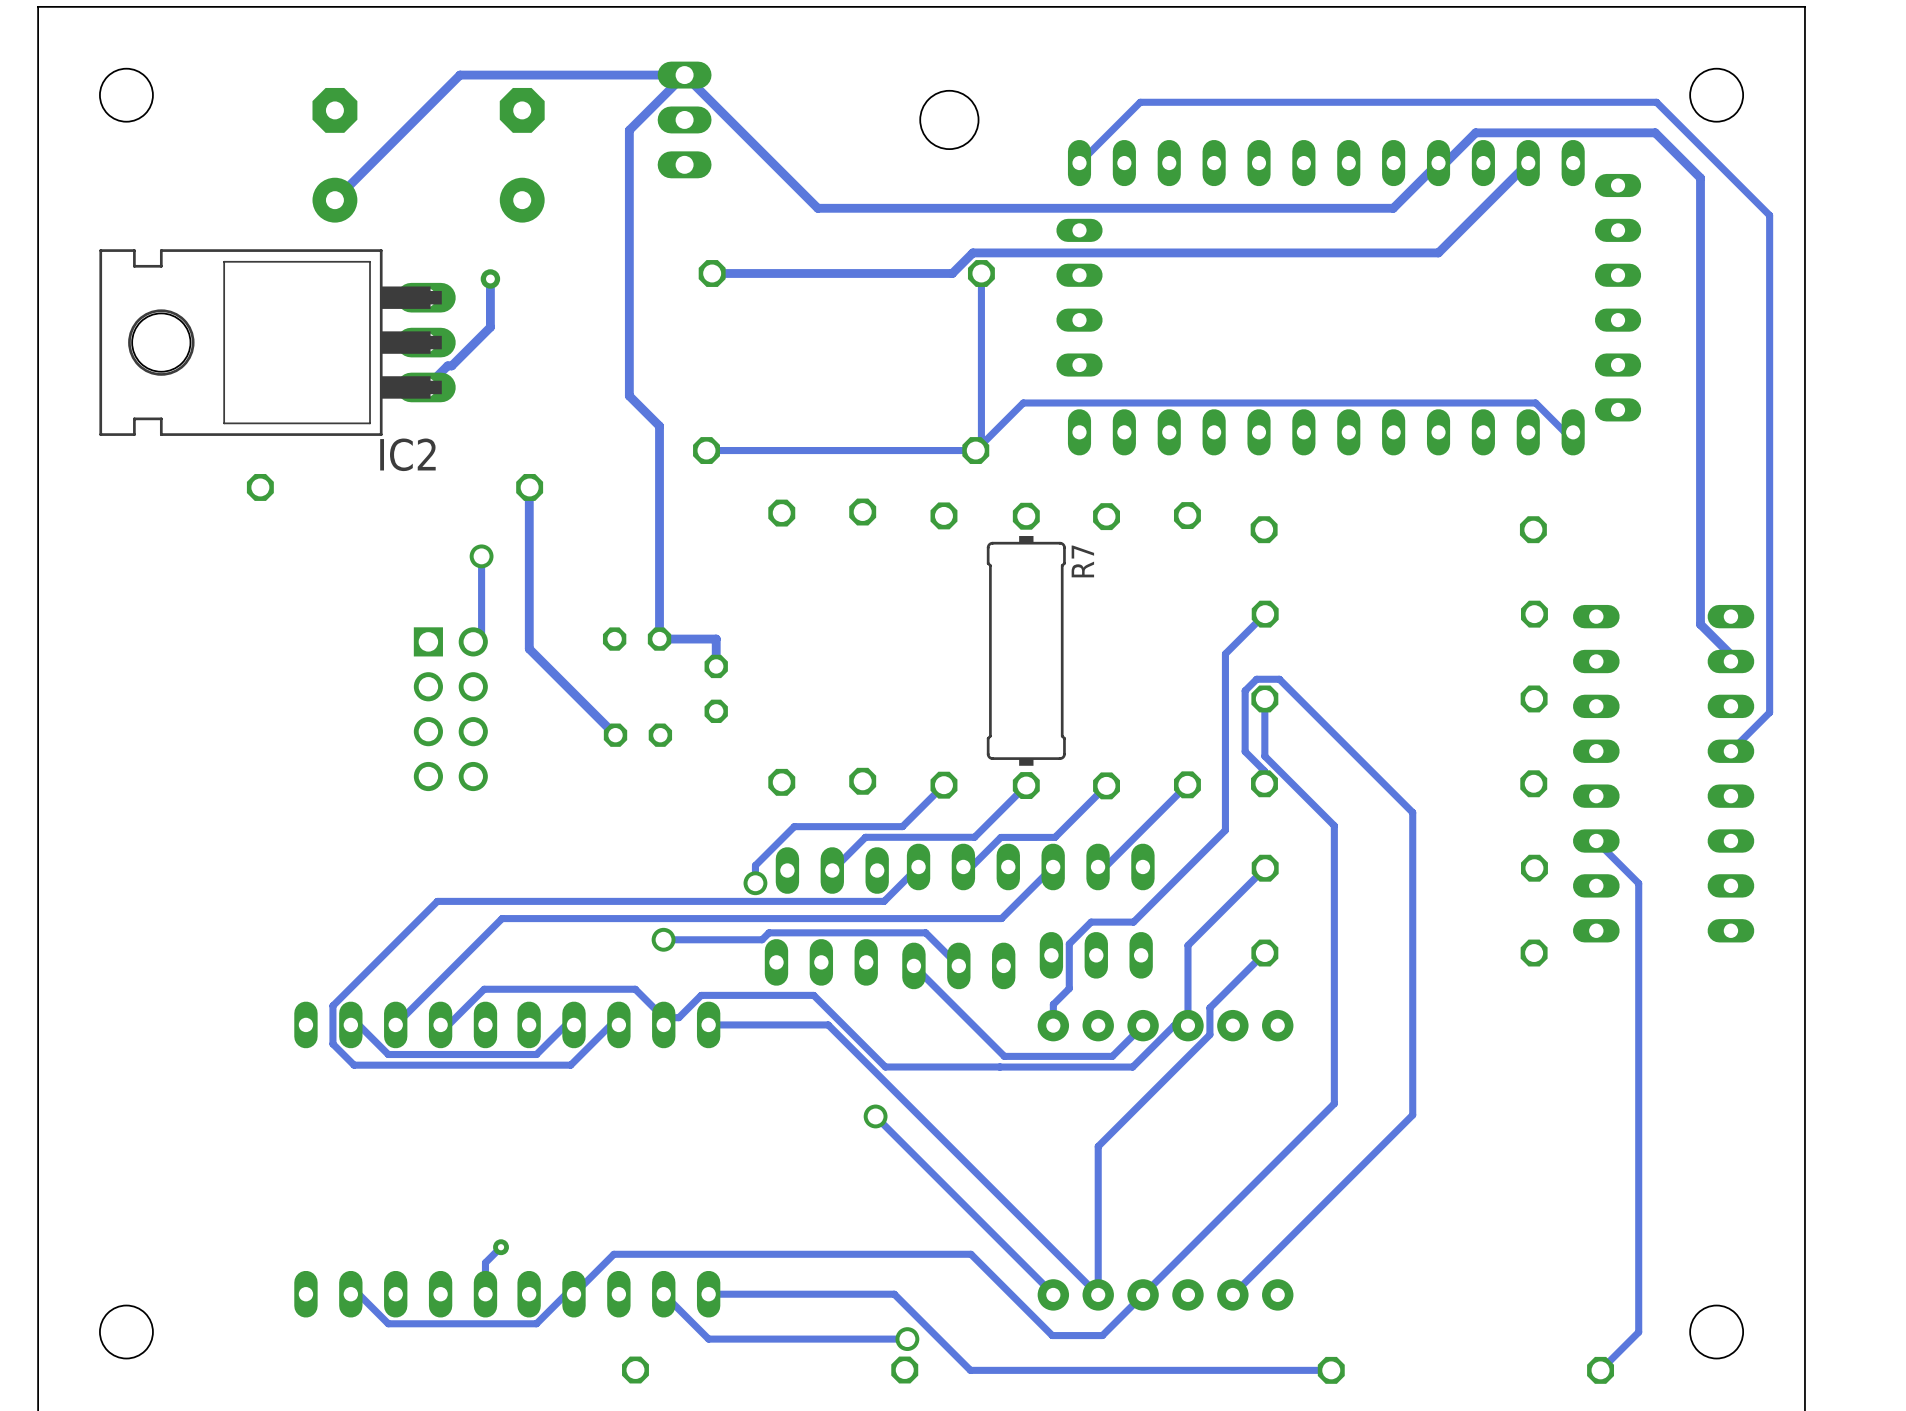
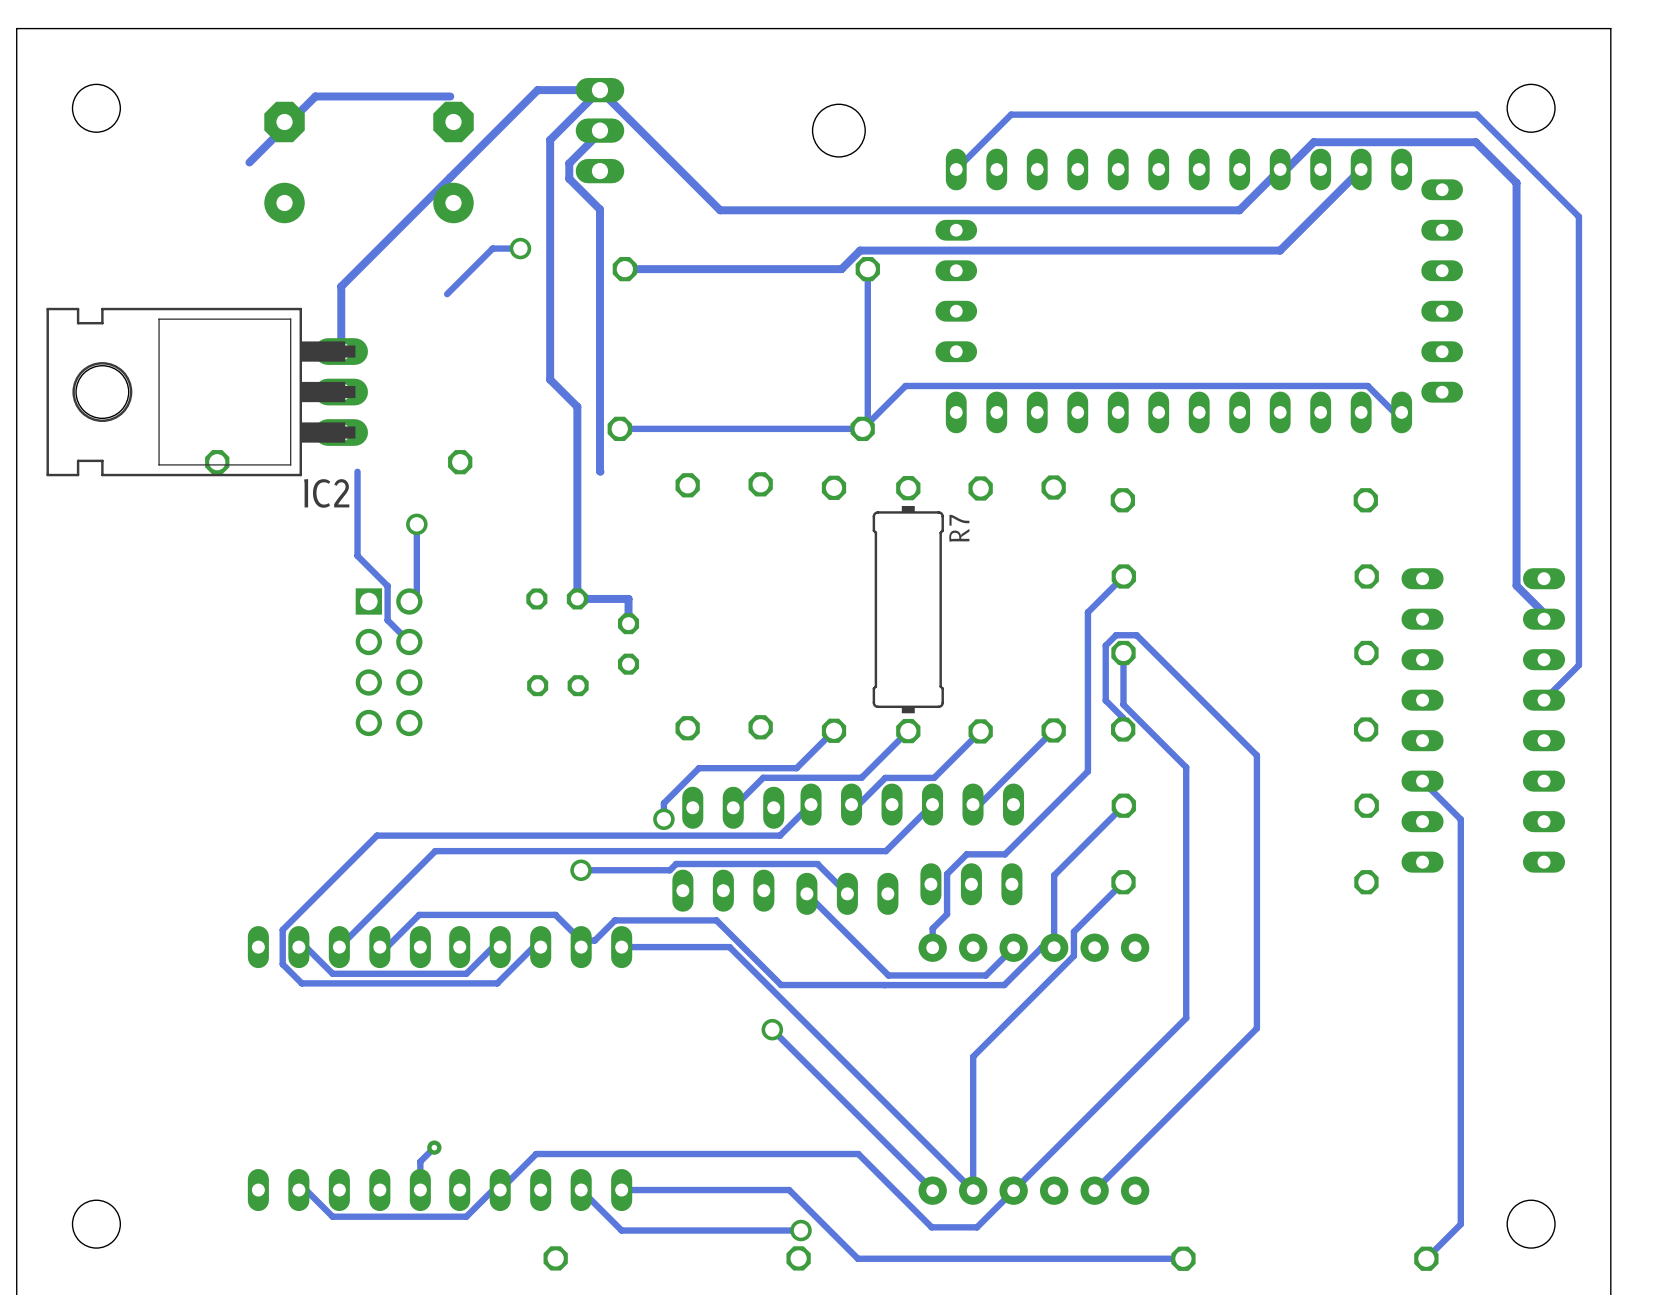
track: (615, 75) (460, 75) (334, 200) -> (537, 90) (341, 286) (341, 351)
track: none -> (450, 96) (315, 96) (249, 162)
track: none -> (599, 130) (569, 163) (569, 178) (599, 209) (600, 471)
track: none -> (520, 248) (492, 248) (447, 294)
via: none -> (520, 248)
track: (490, 278) (490, 327) (451, 365) (447, 365) (426, 387) -> none
via: (490, 278) -> none
IC2 position: (277, 342) -> (207, 392)
track: (529, 487) (529, 648) (615, 735) -> none
track: none -> (357, 471) (357, 555) (387, 586) (387, 620) (409, 641)

